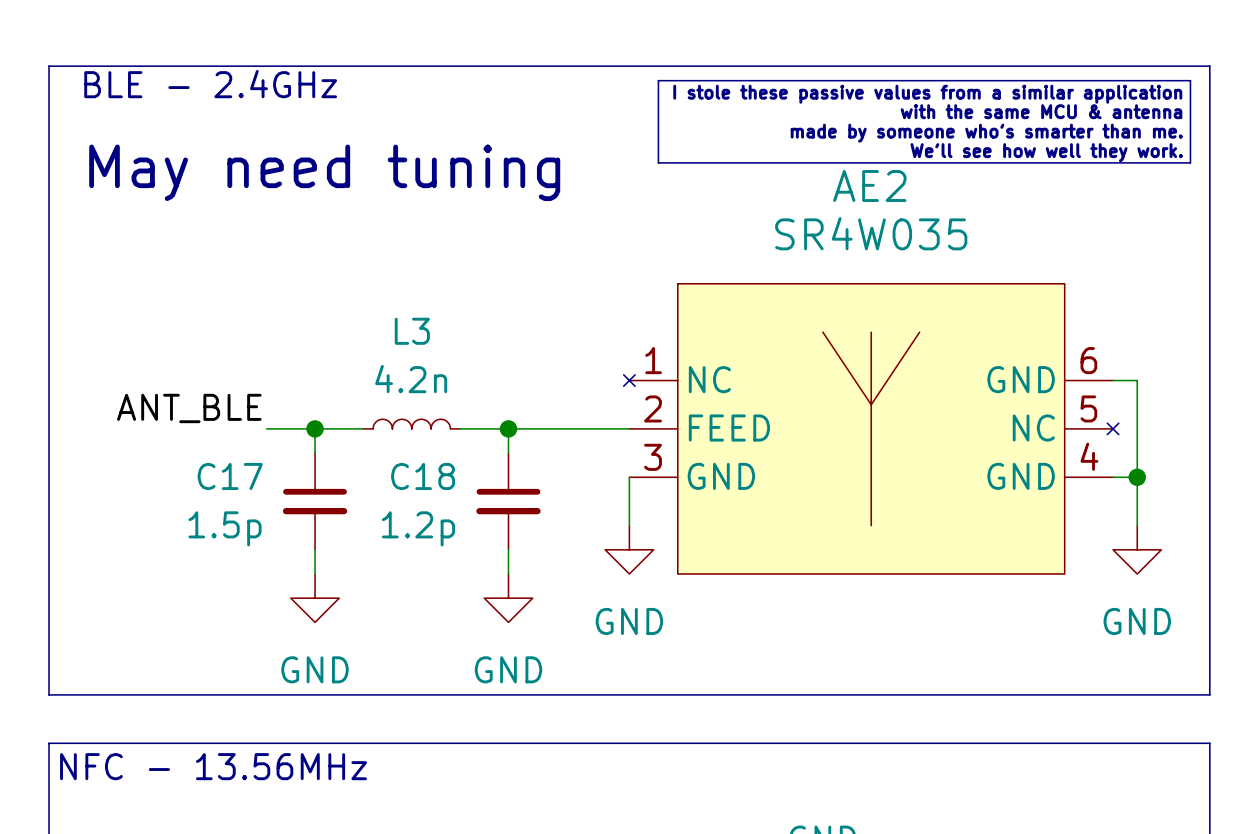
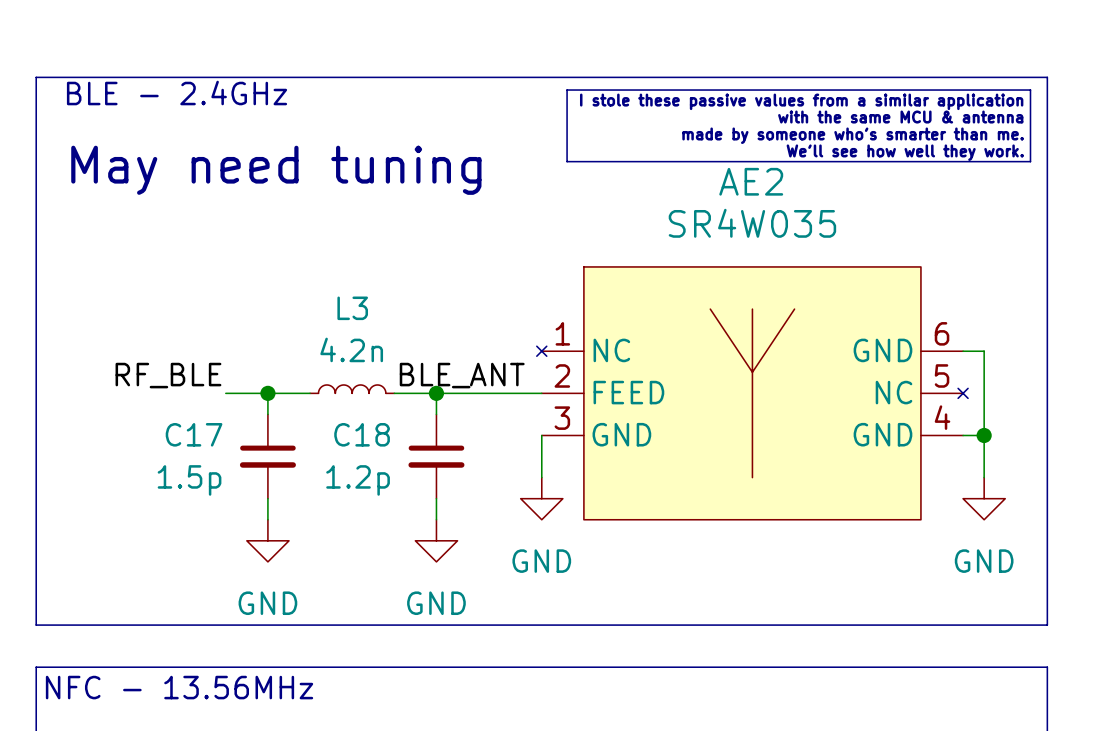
label: ANT_BLE (189, 408) -> RF_BLE (168, 375)
label: none -> BLE_ANT (462, 375)

